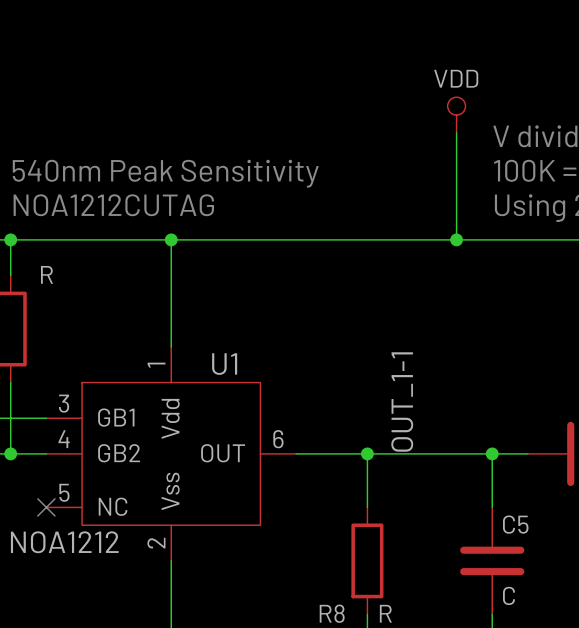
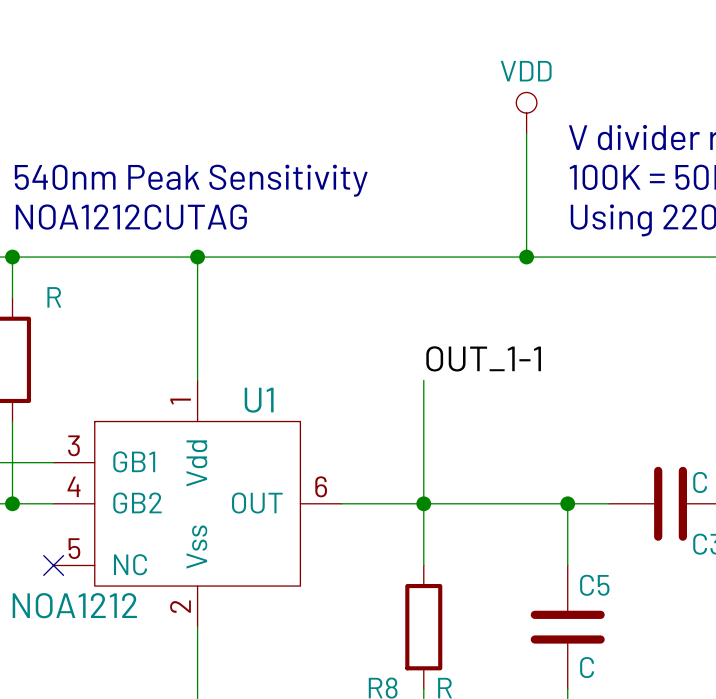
wire: none -> (423, 380) (423, 503)
label rotation: 0° (402, 402) -> 90° clockwise (483, 358)

